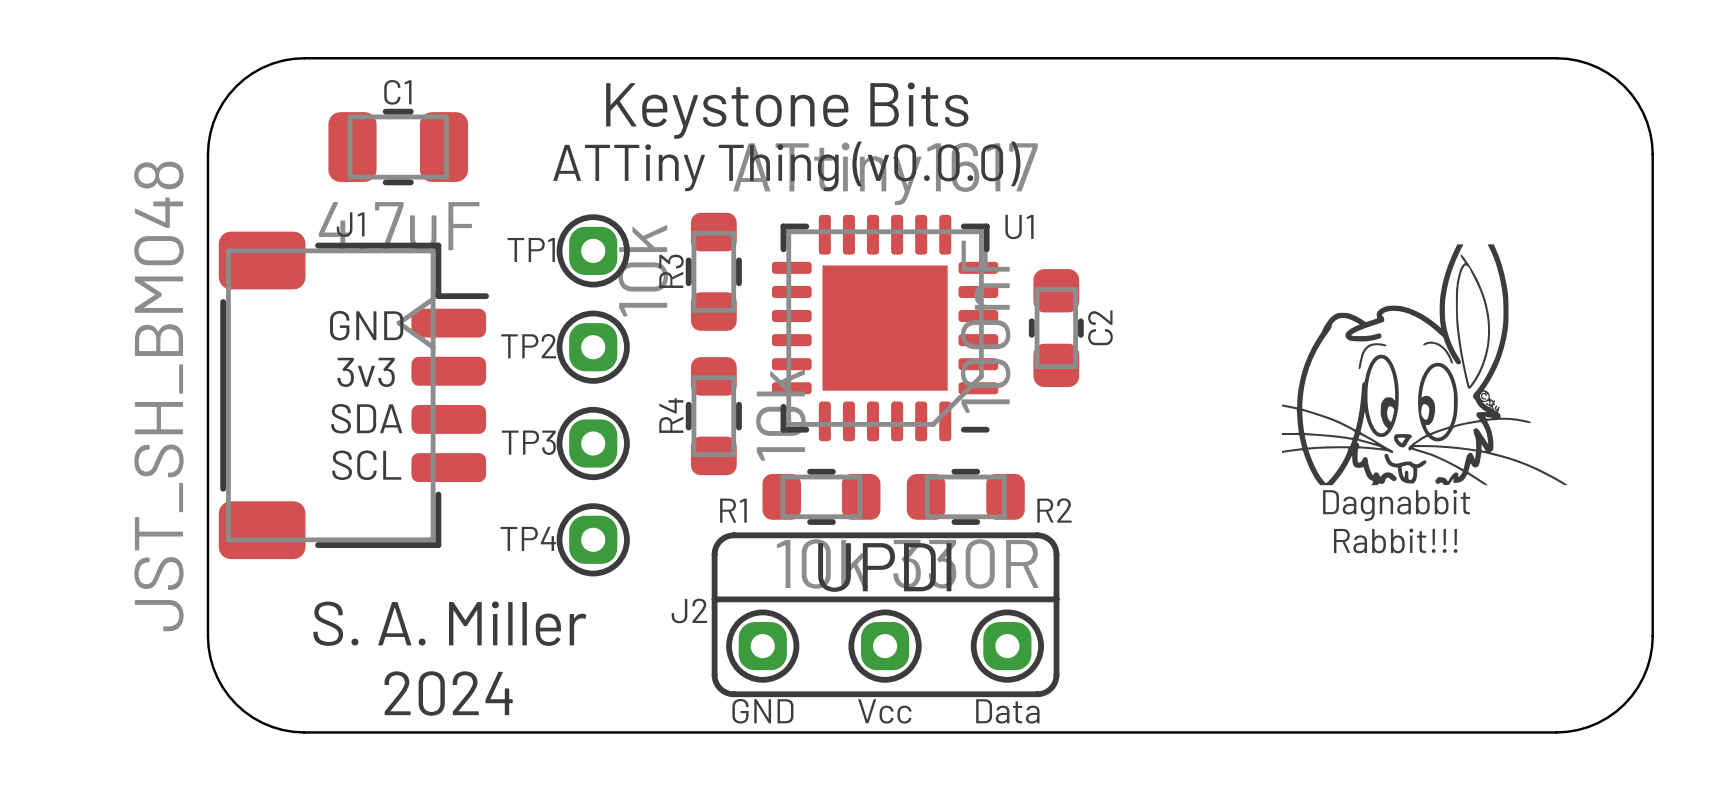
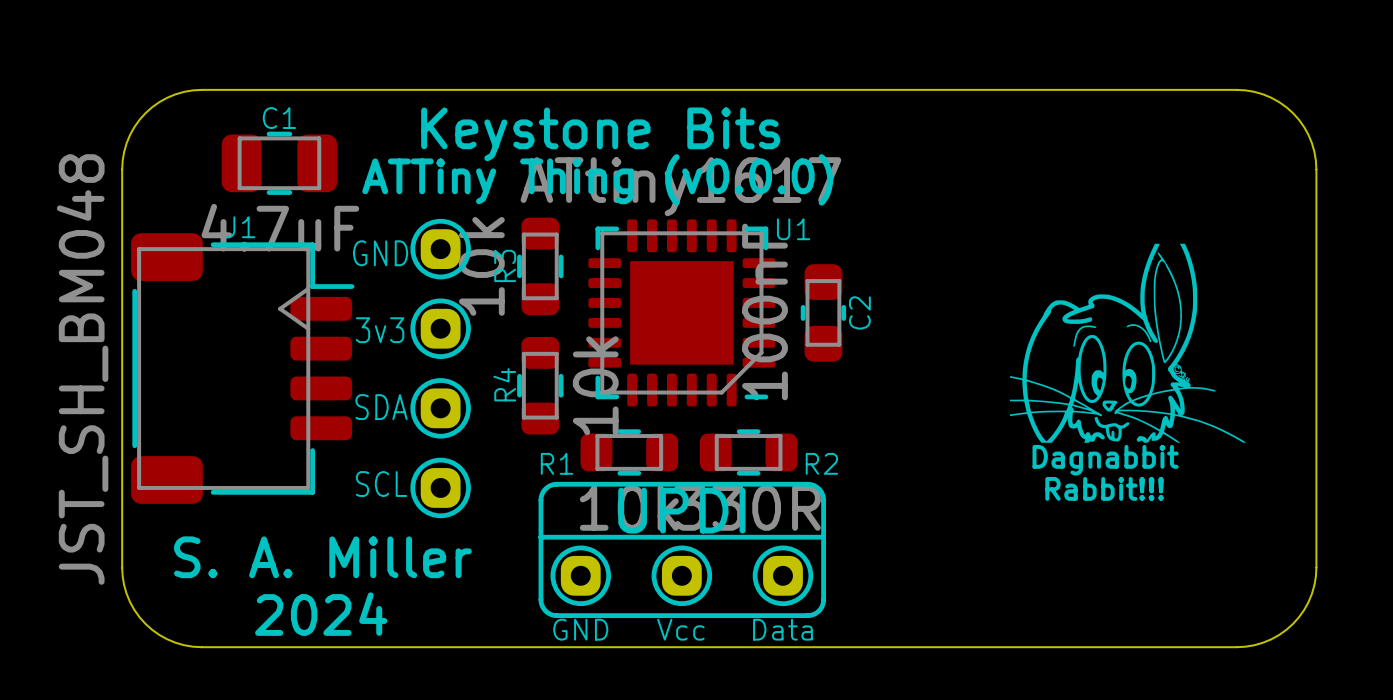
TP1 name: TP1 (531, 249) -> none
text position: GND (366, 325) -> GND (380, 253)
TP2 name: TP2 (528, 346) -> none
text position: 3v3 (366, 372) -> 3v3 (380, 330)
text position: SDA (366, 418) -> SDA (381, 407)
TP3 name: TP3 (528, 442) -> none
text position: SCL (366, 465) -> SCL (381, 484)
TP4 name: TP4 (528, 538) -> none
J2 name: J2 (689, 610) -> none

